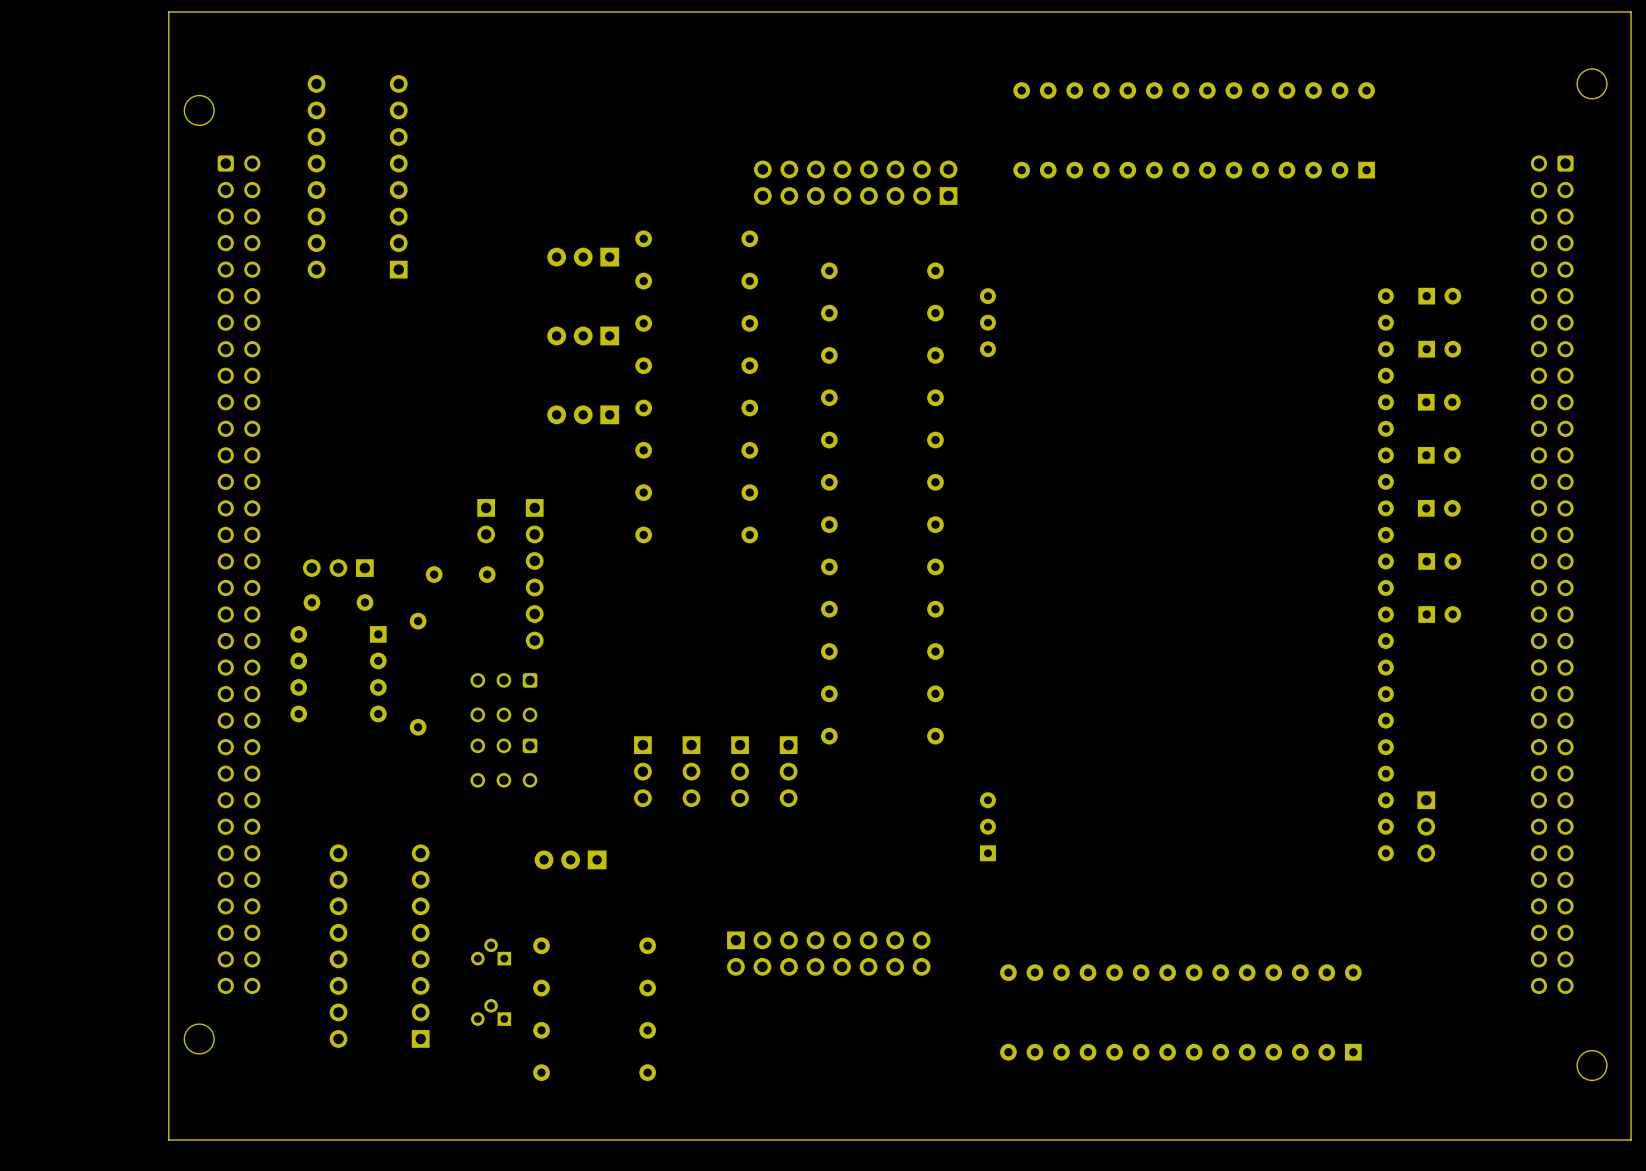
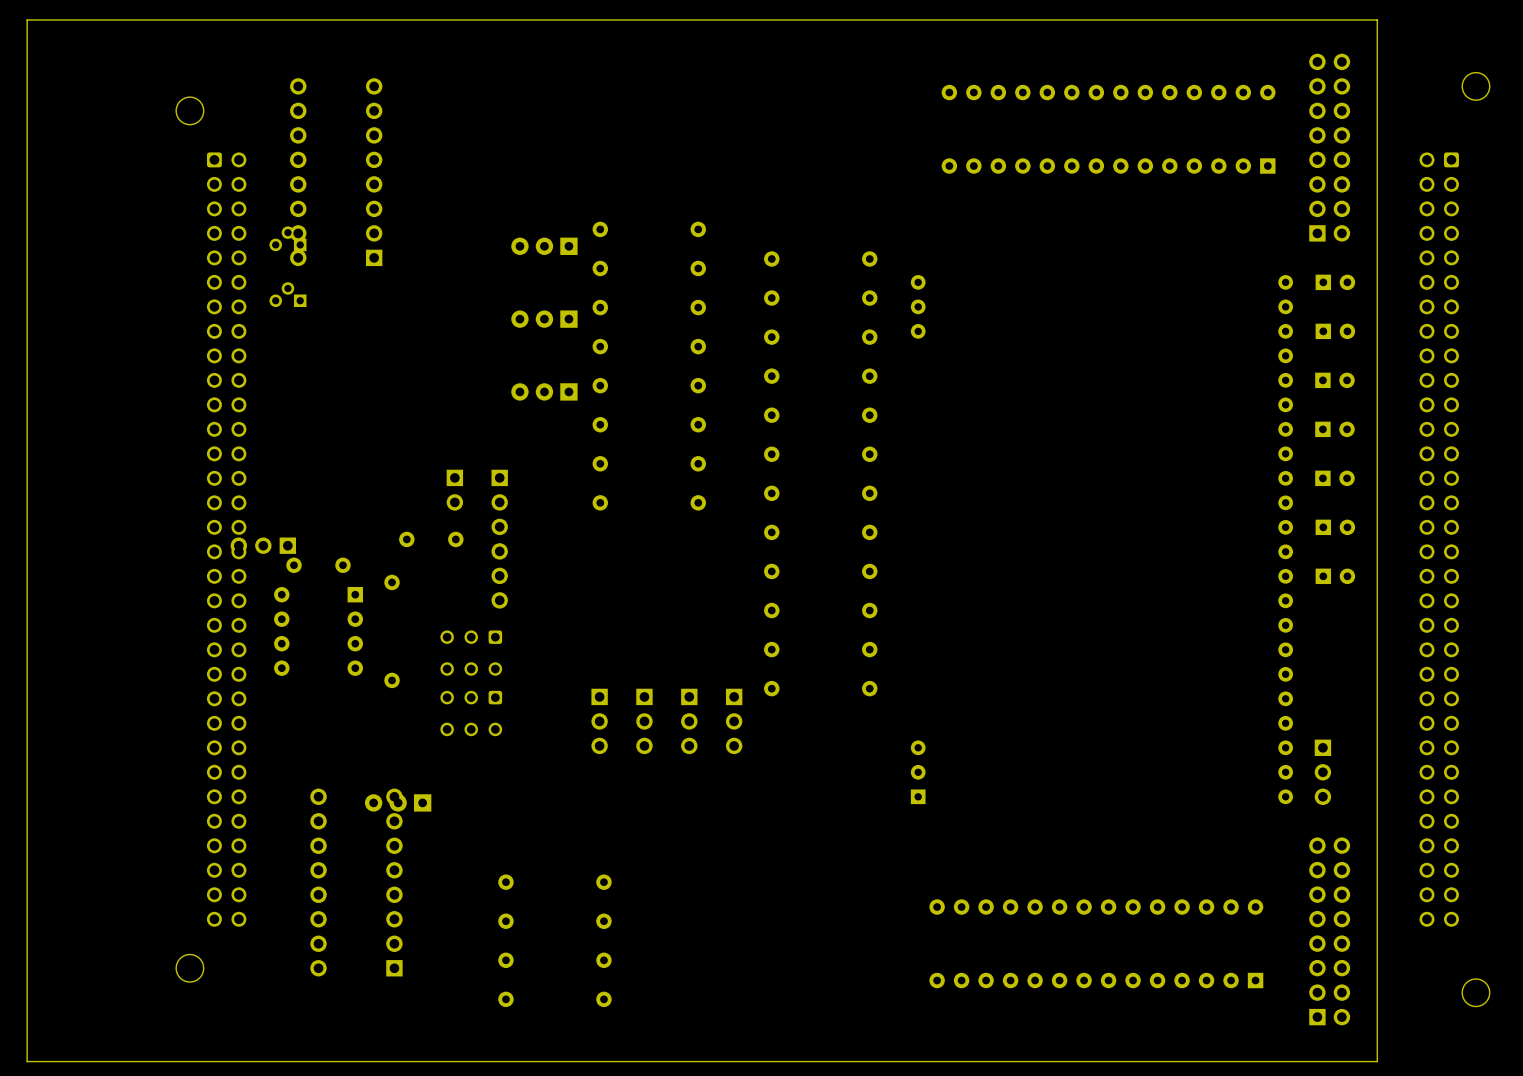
part: none -> (1329, 147)
part: (855, 182) -> none
part: none -> (287, 238)
part: none -> (287, 294)
part position: (338, 568) -> (263, 545)
drawing position: (899, 576) -> (702, 540)
part position: (570, 859) -> (398, 802)
part: (491, 951) -> none
part: (828, 953) -> none
part: none -> (1329, 931)
part: (491, 1012) -> none

